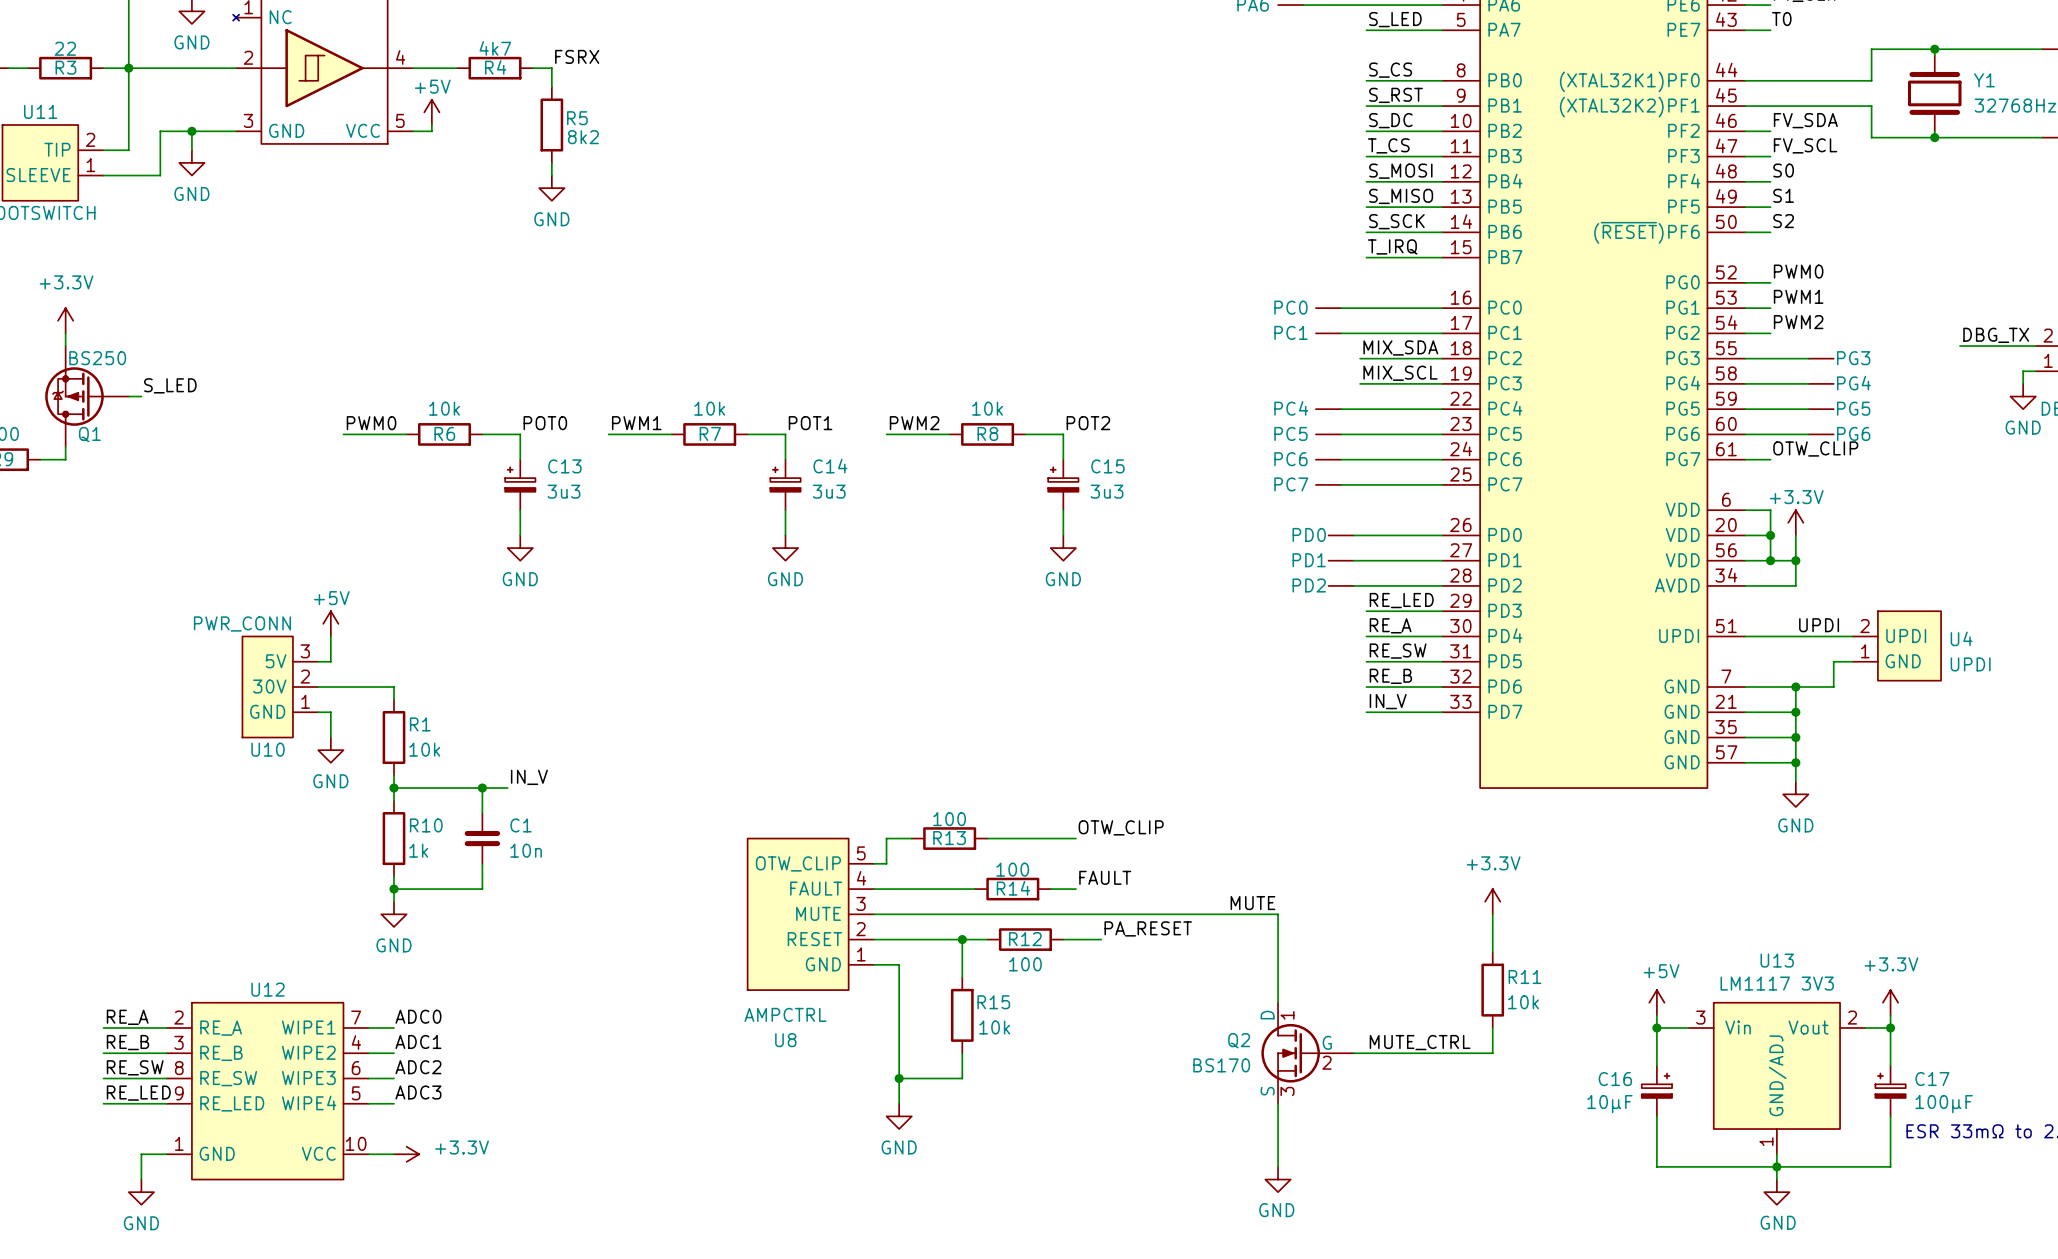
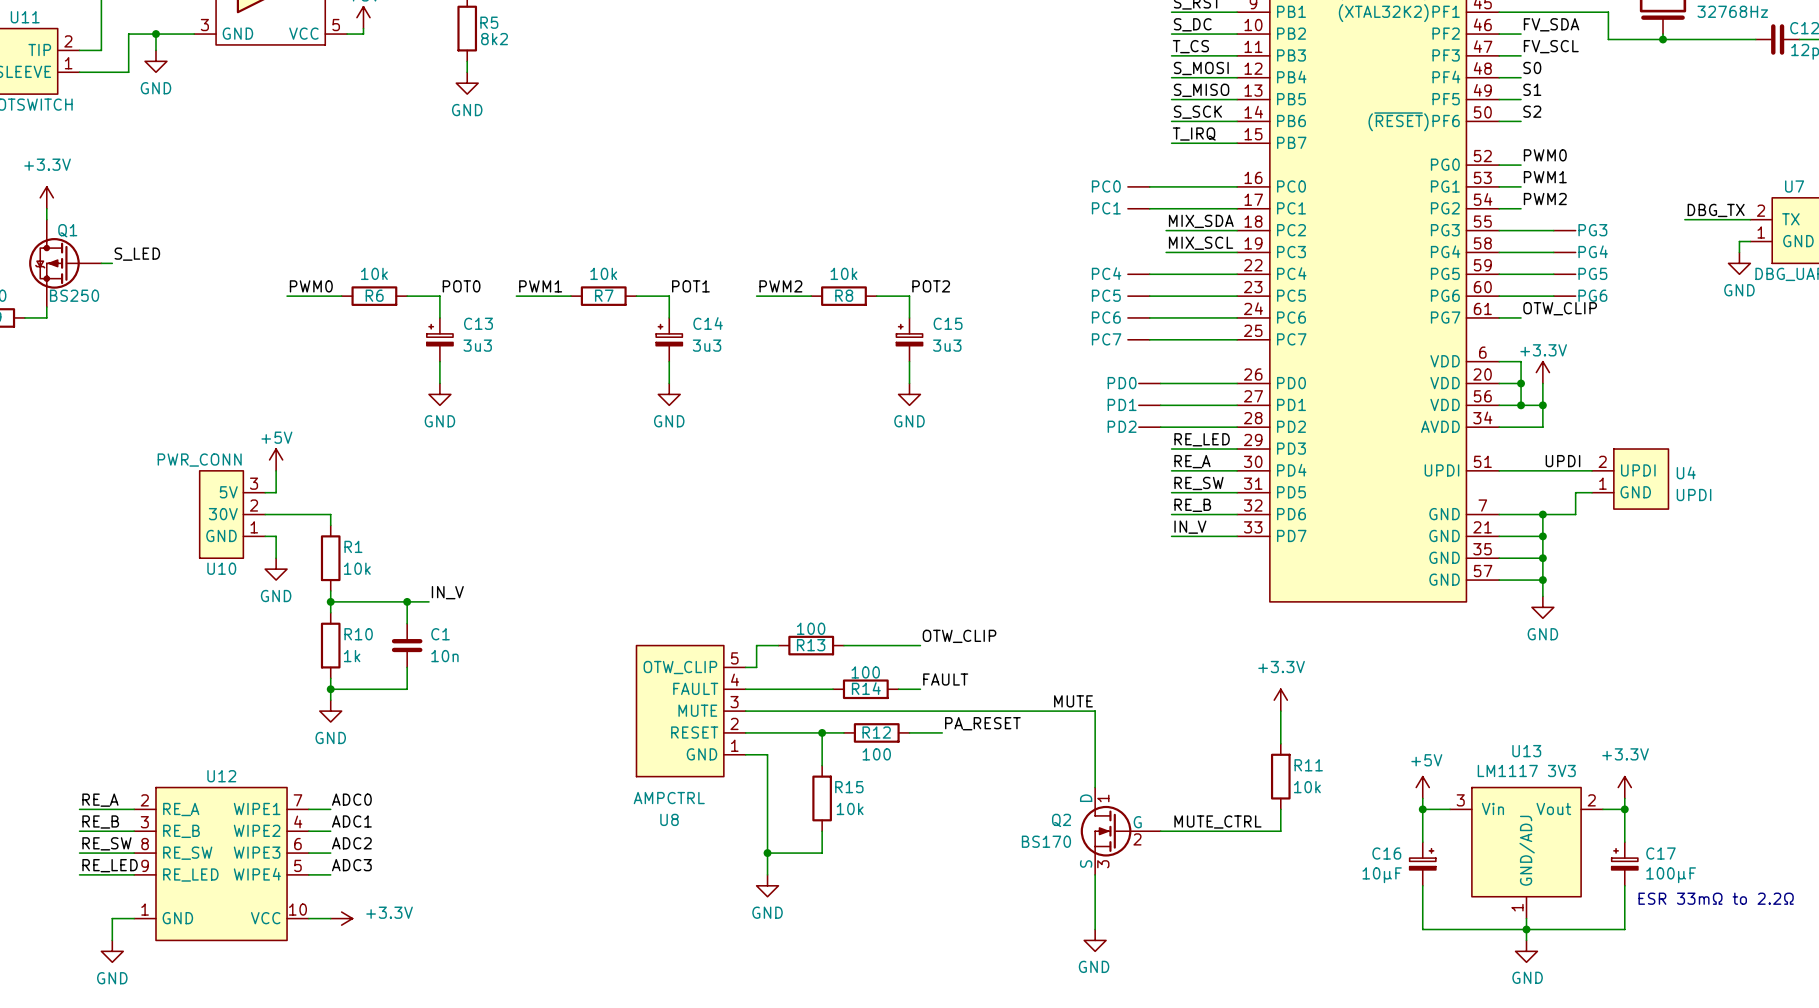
Q1 flip: as is (74, 396) -> up-down (54, 263)

